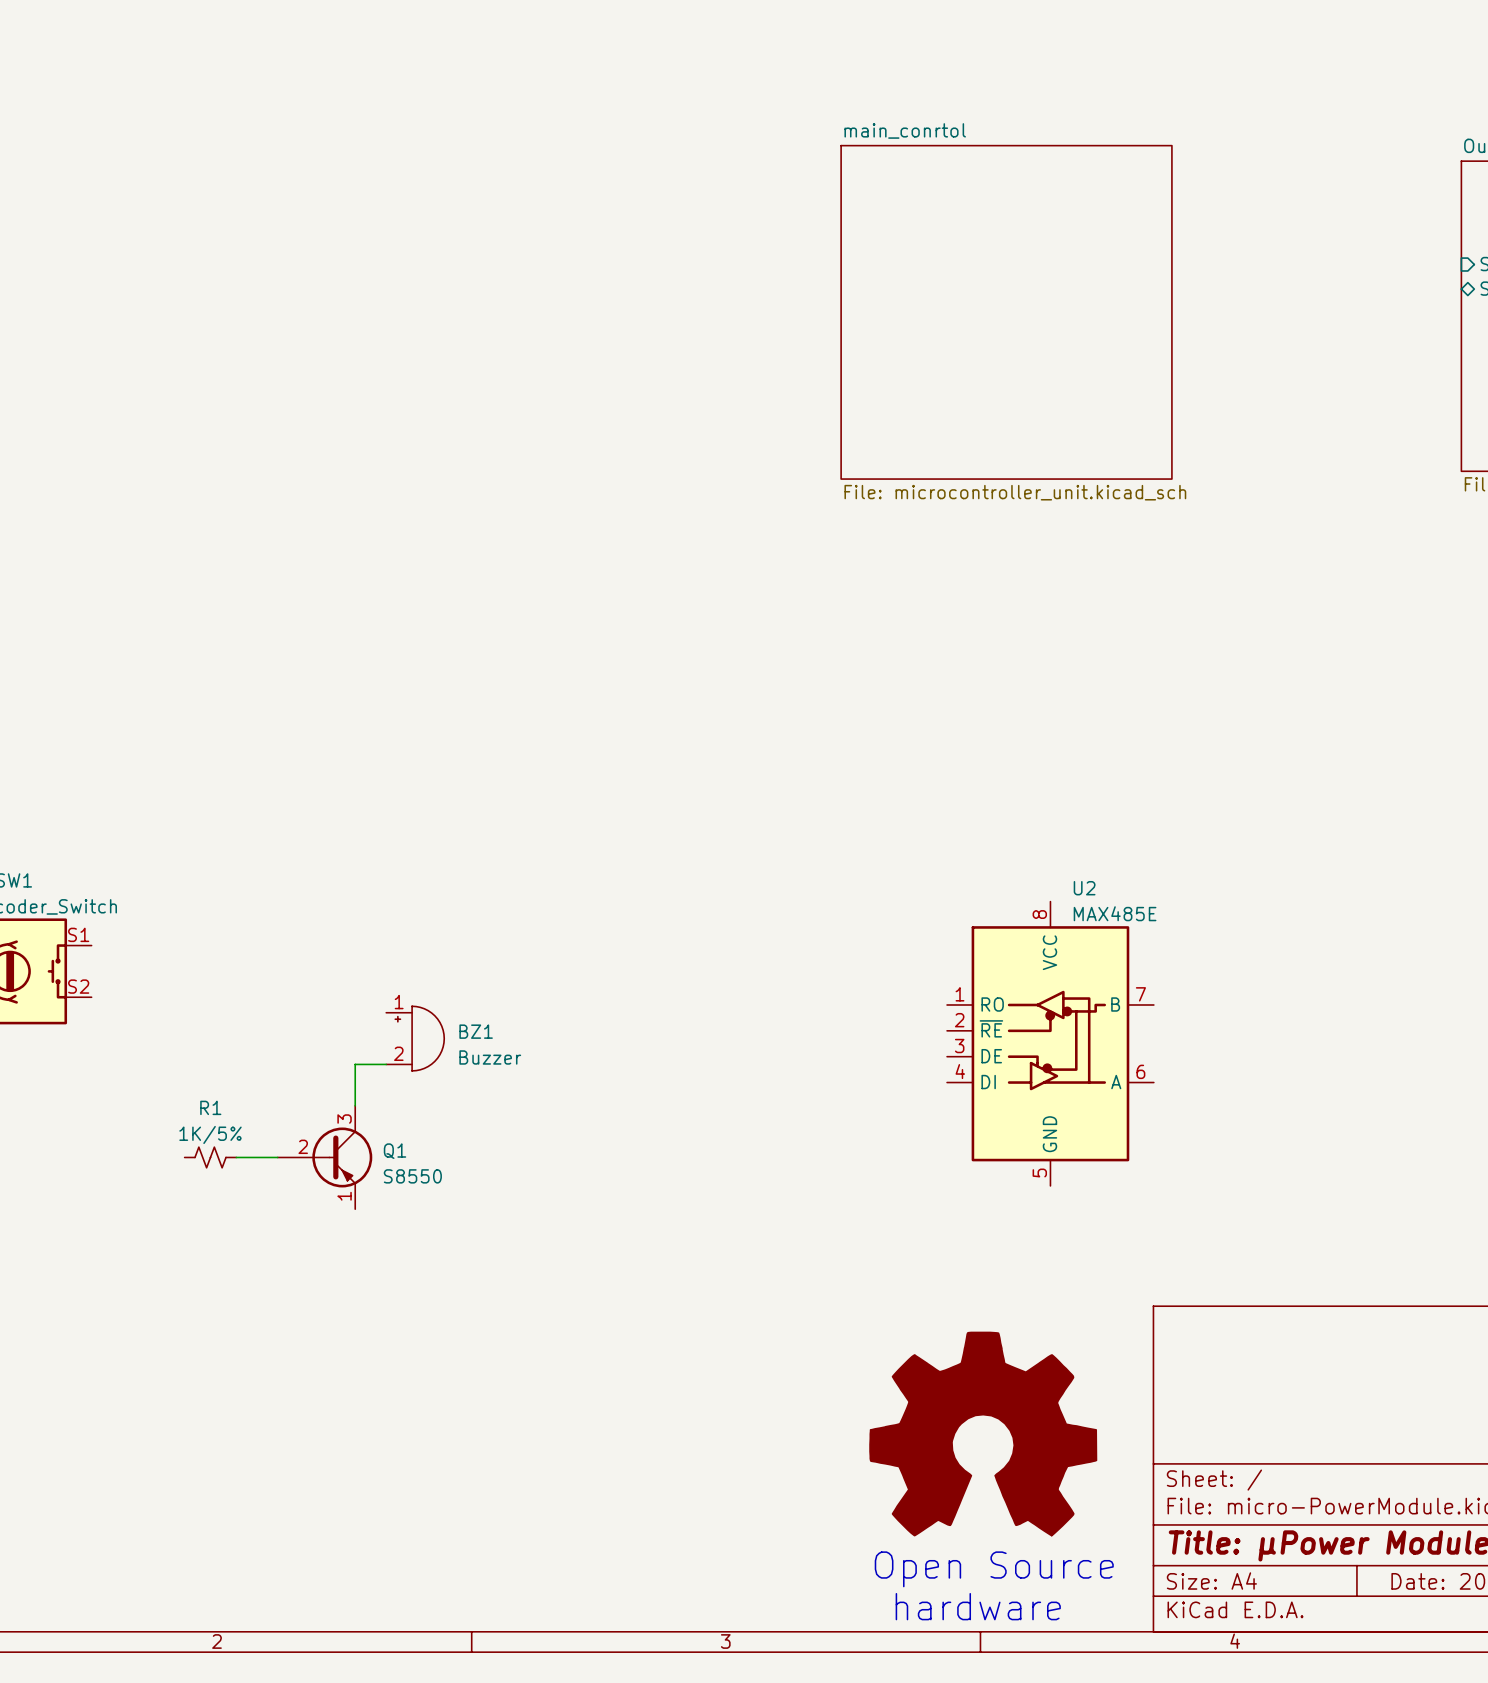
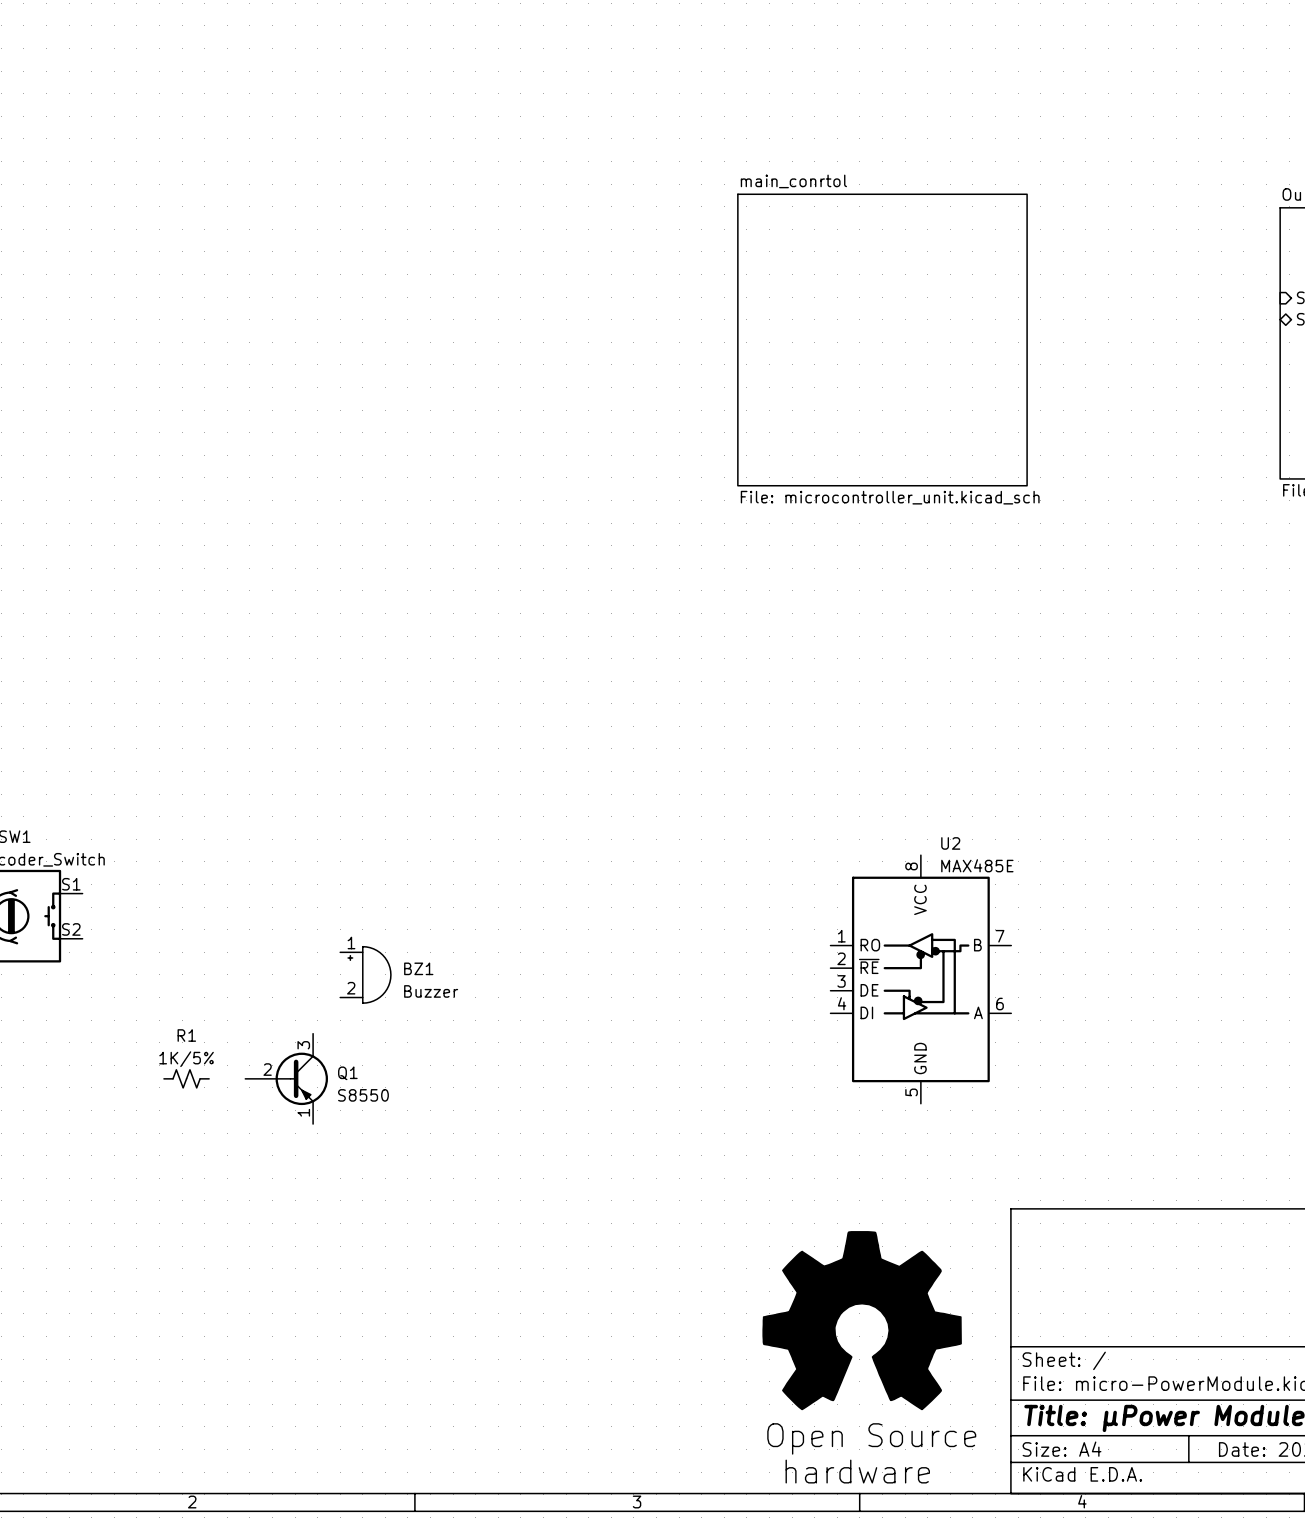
wire: (386, 1064) (355, 1064) (355, 1105) -> none
wire: (236, 1157) (277, 1157) -> none

